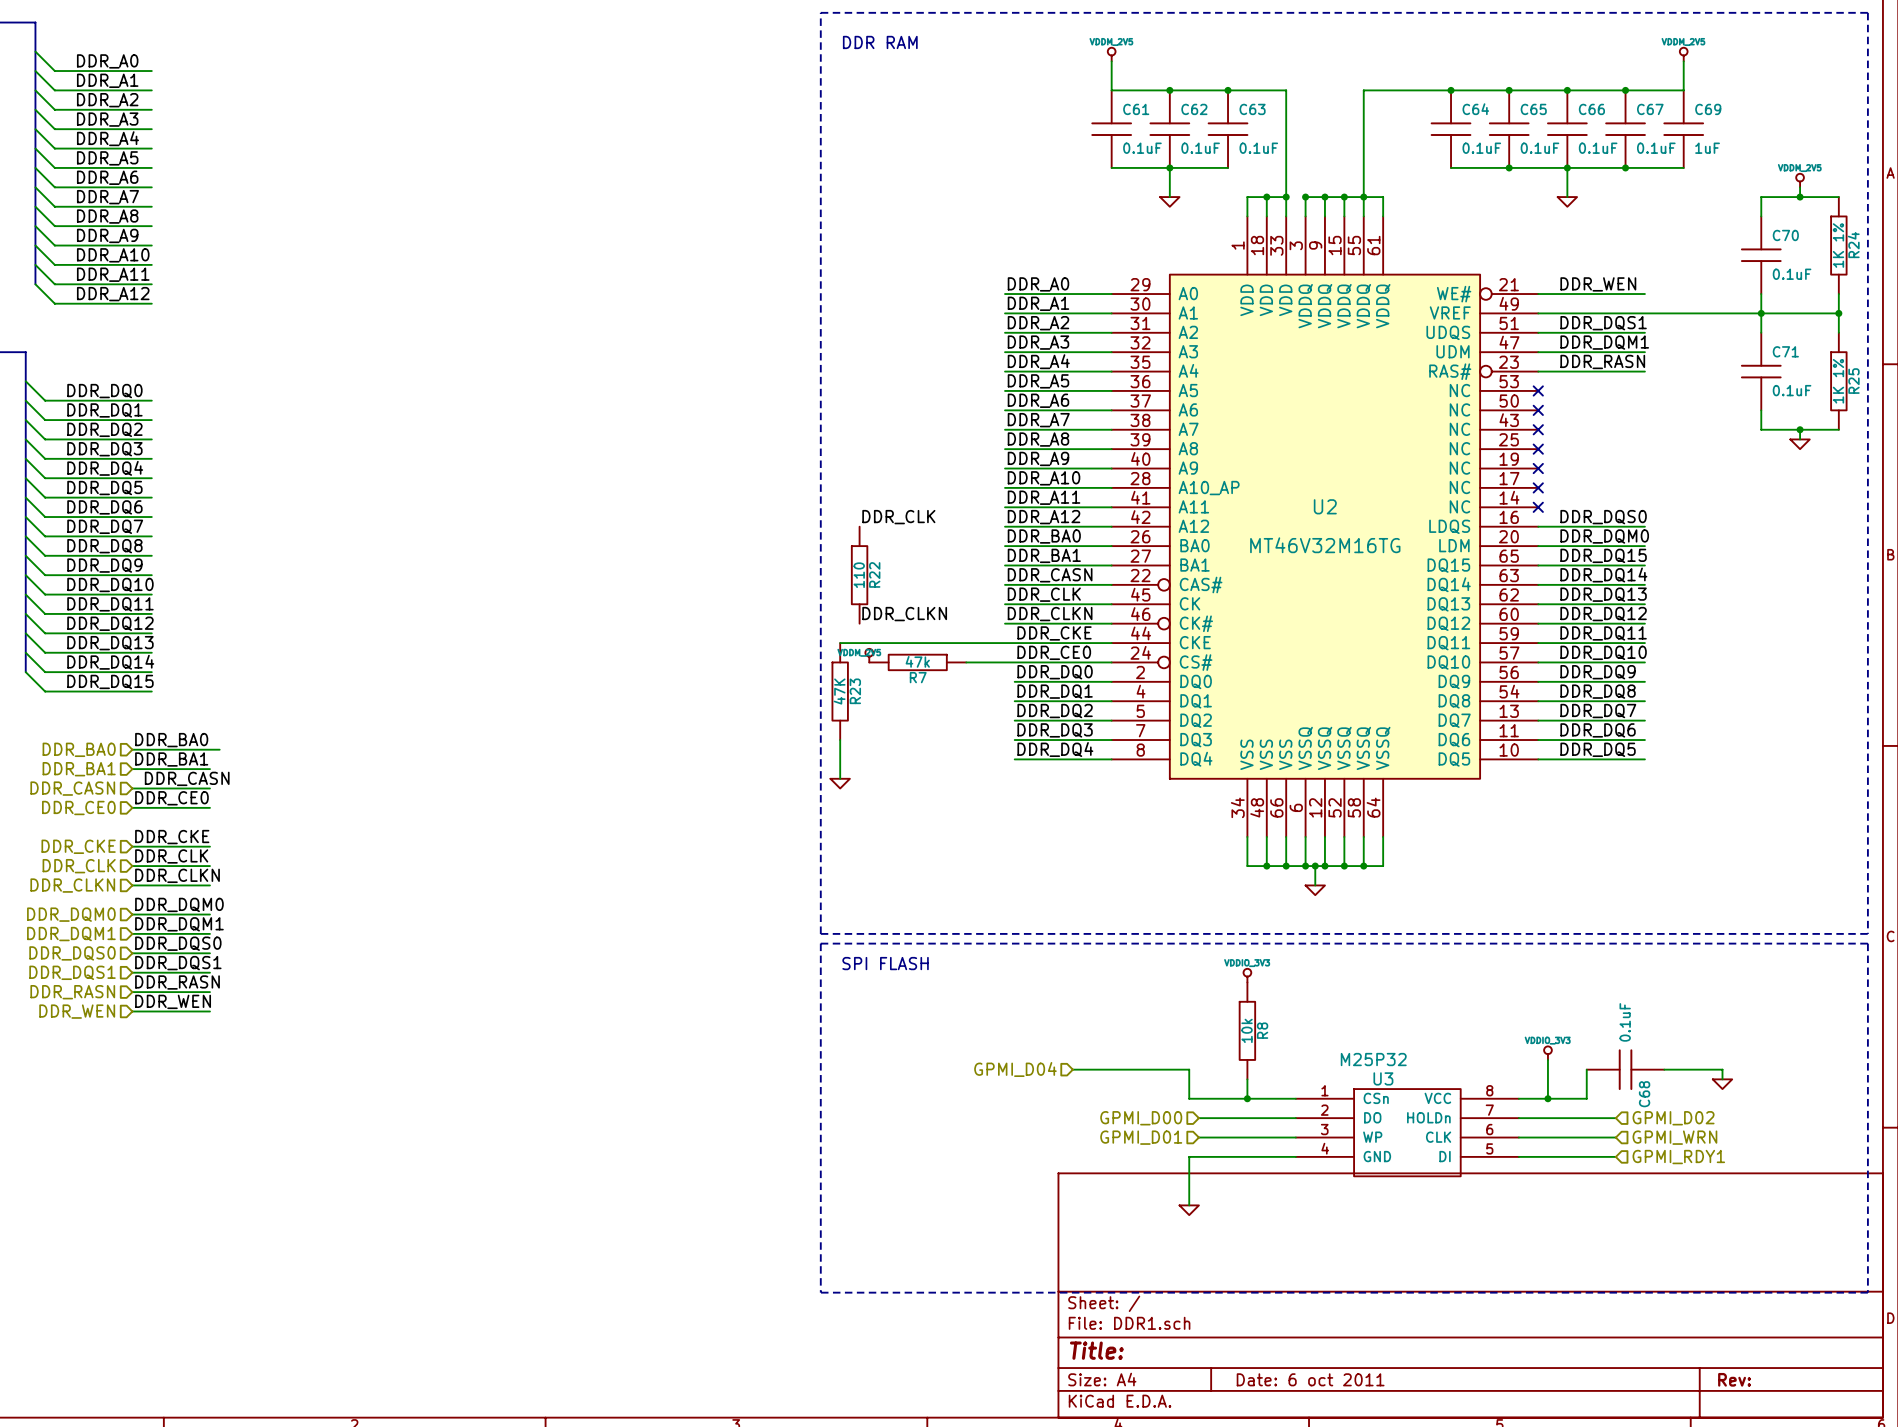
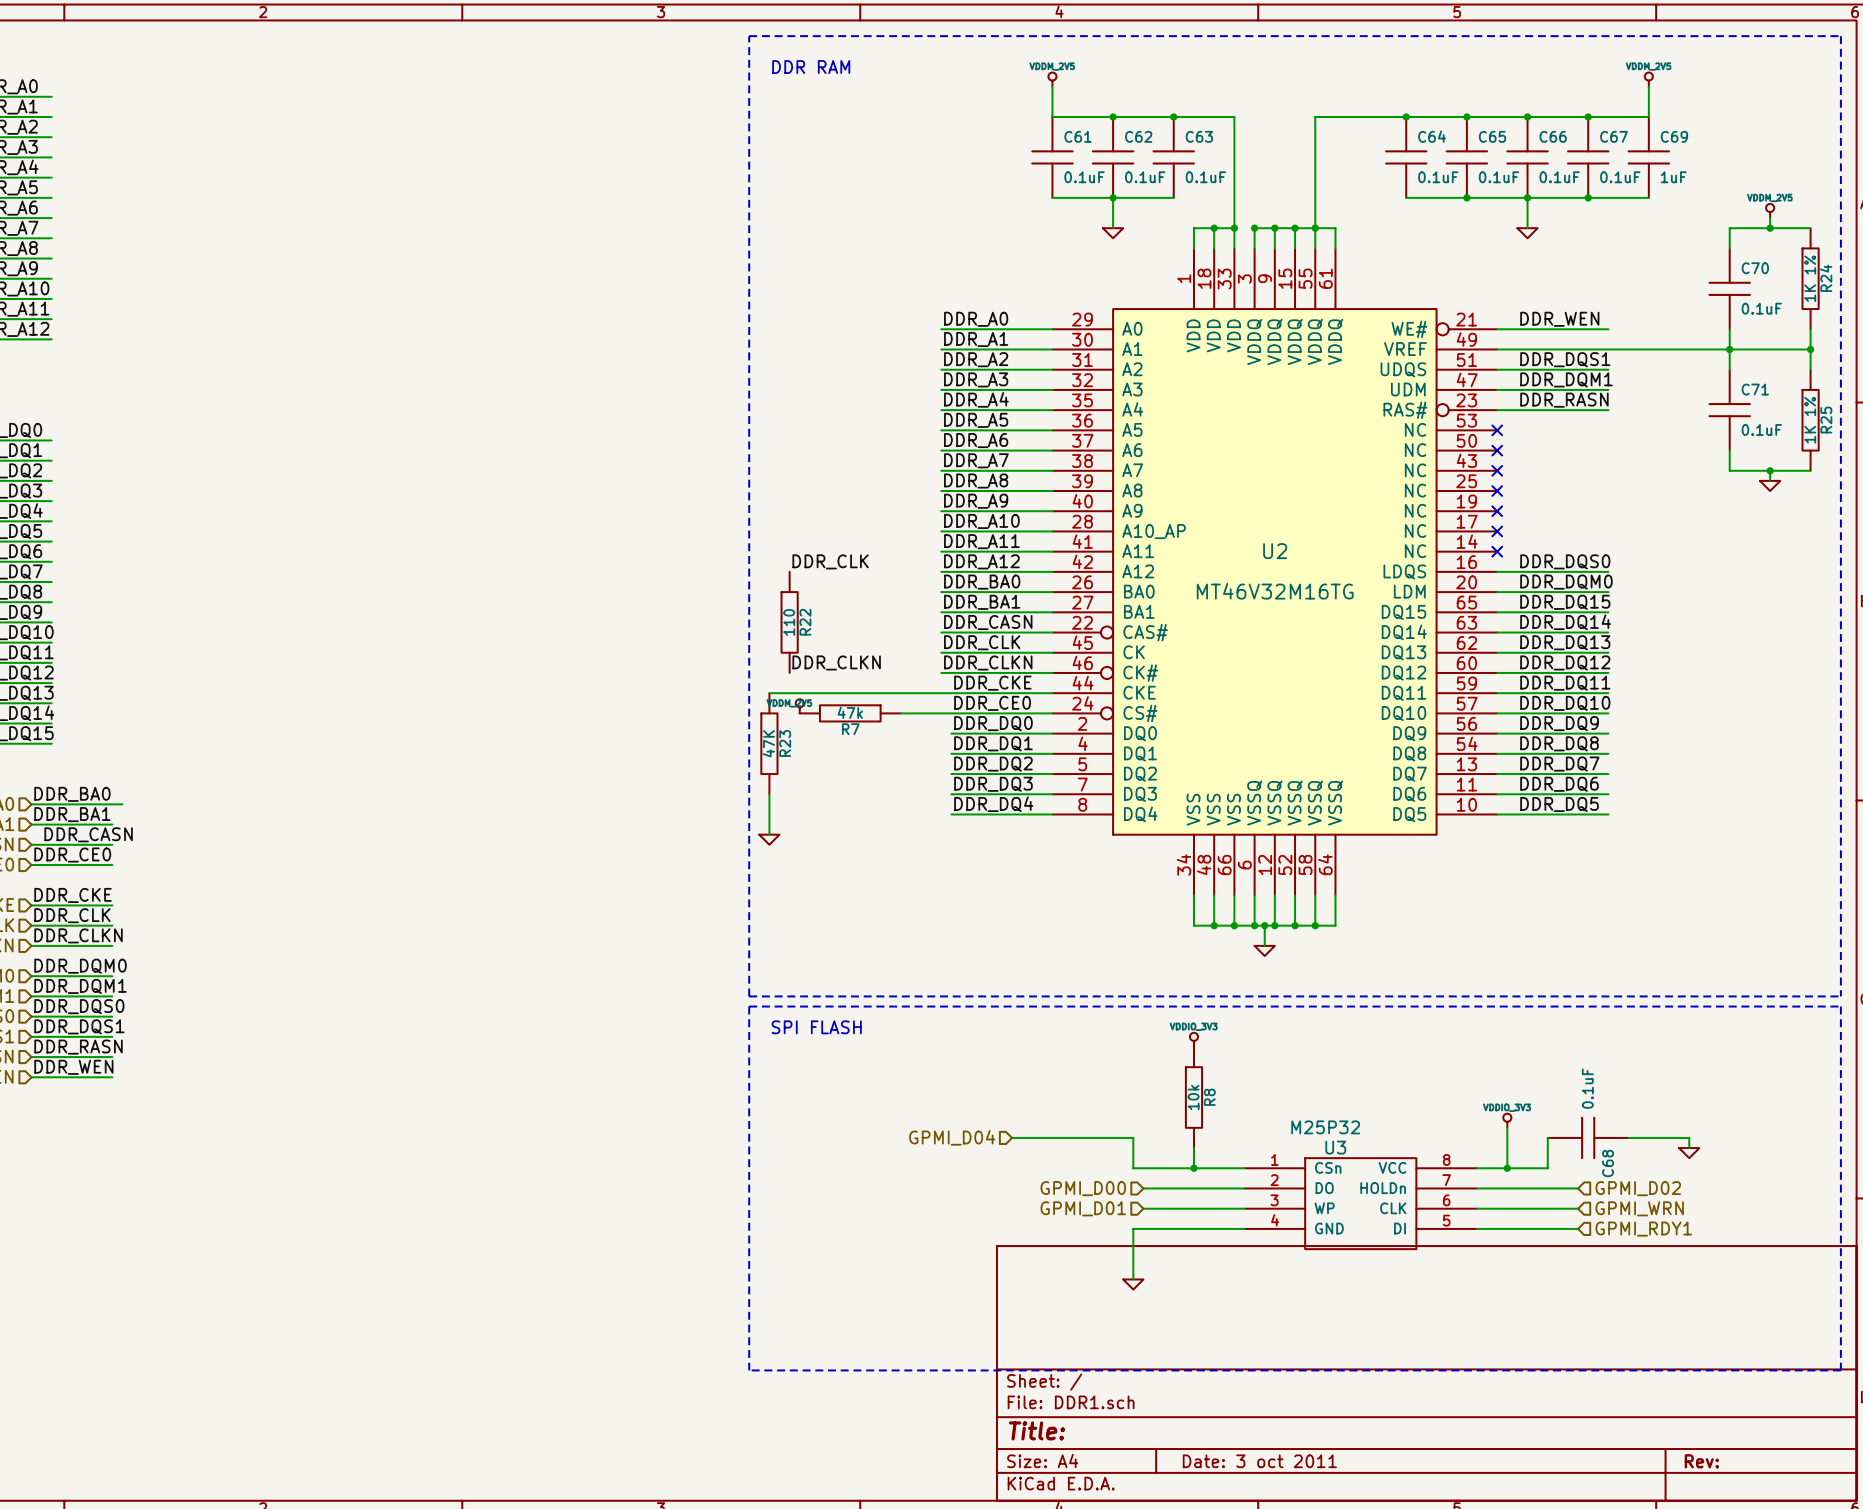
title block: Date: 6 oct 2011 (1310, 1379) -> Date: 3 oct 2011 (1259, 1461)

